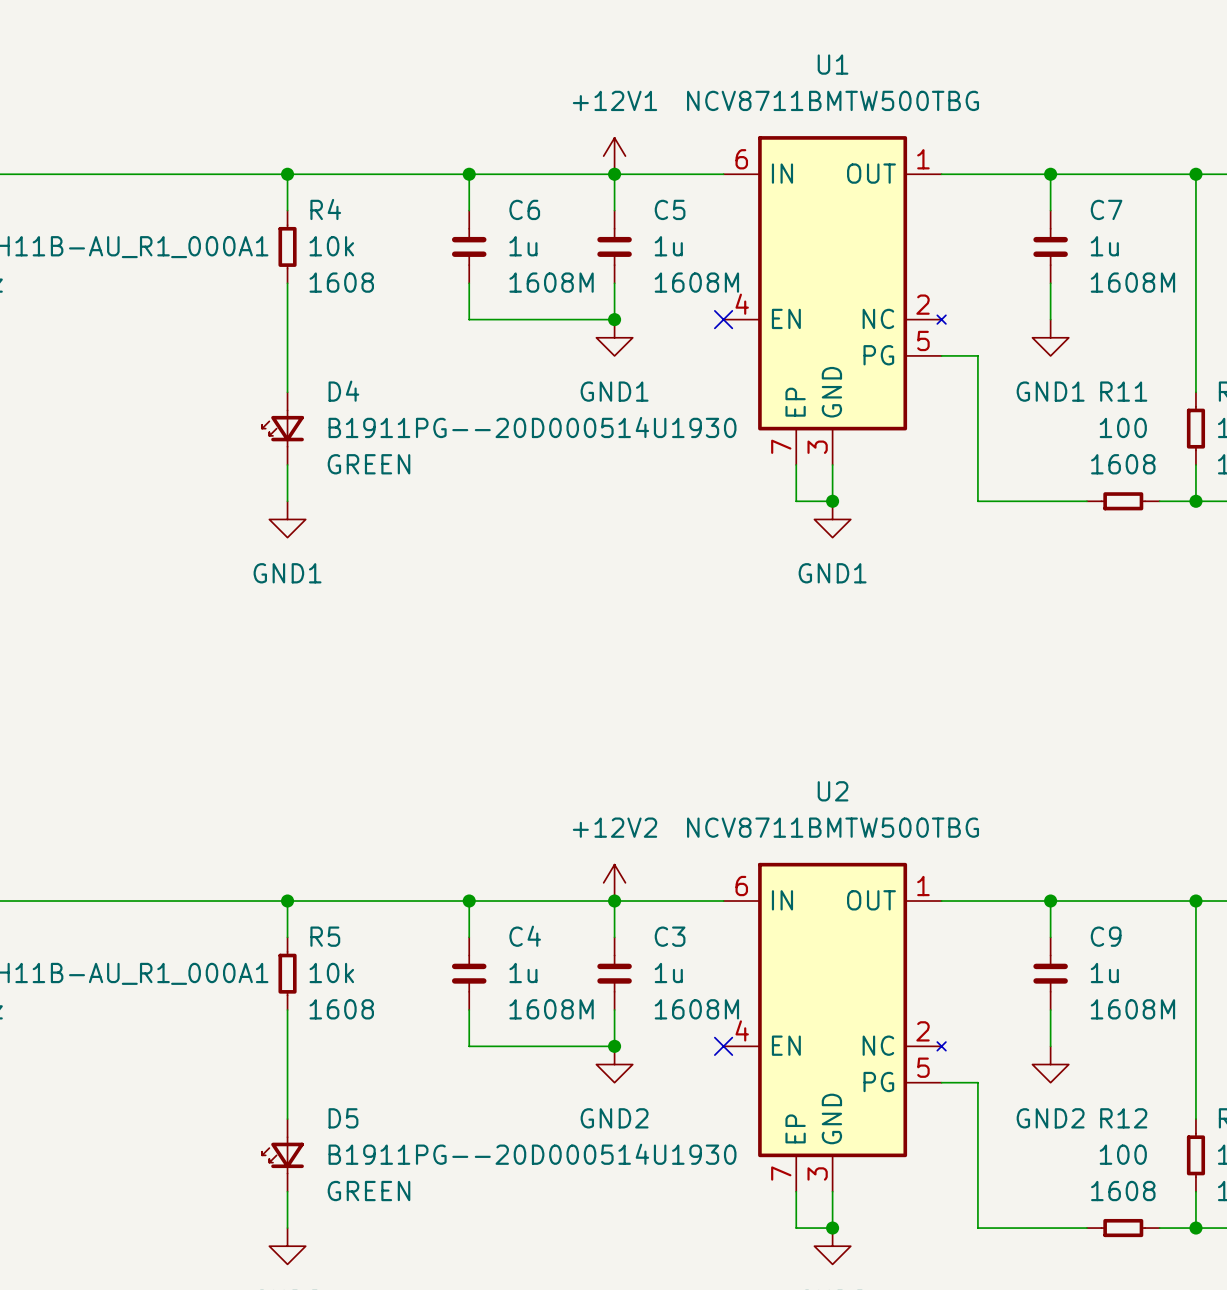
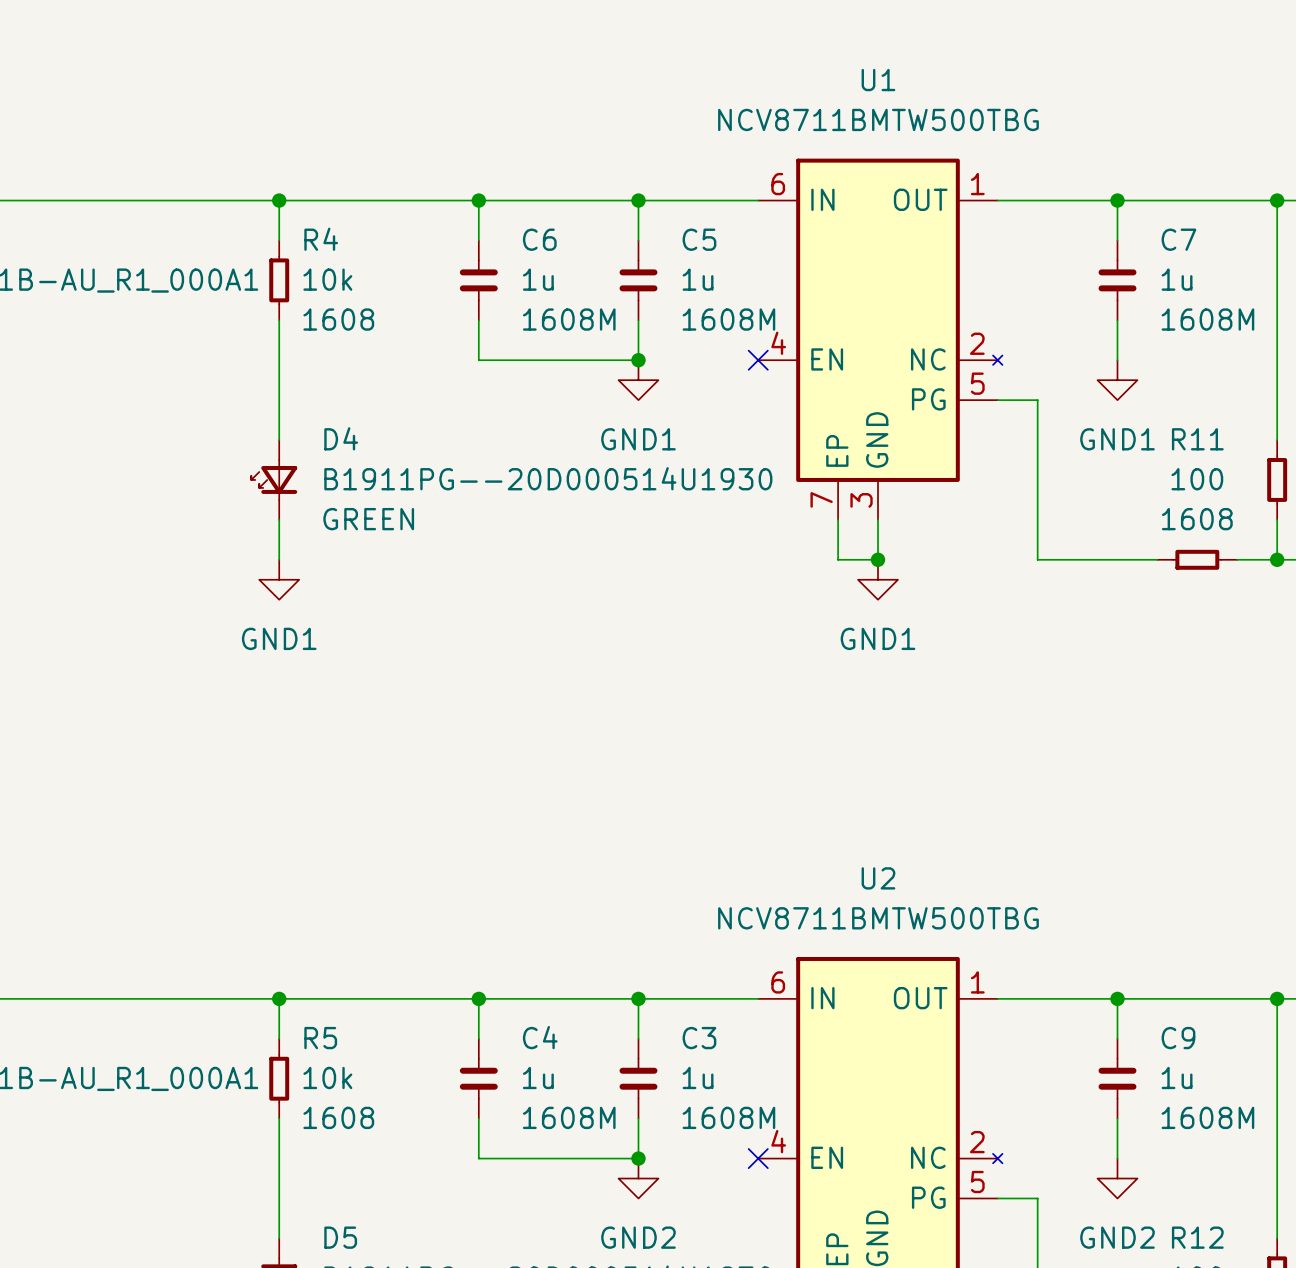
power symbol: +12V1 (614, 156) -> none
power symbol: +12V2 (614, 882) -> none

